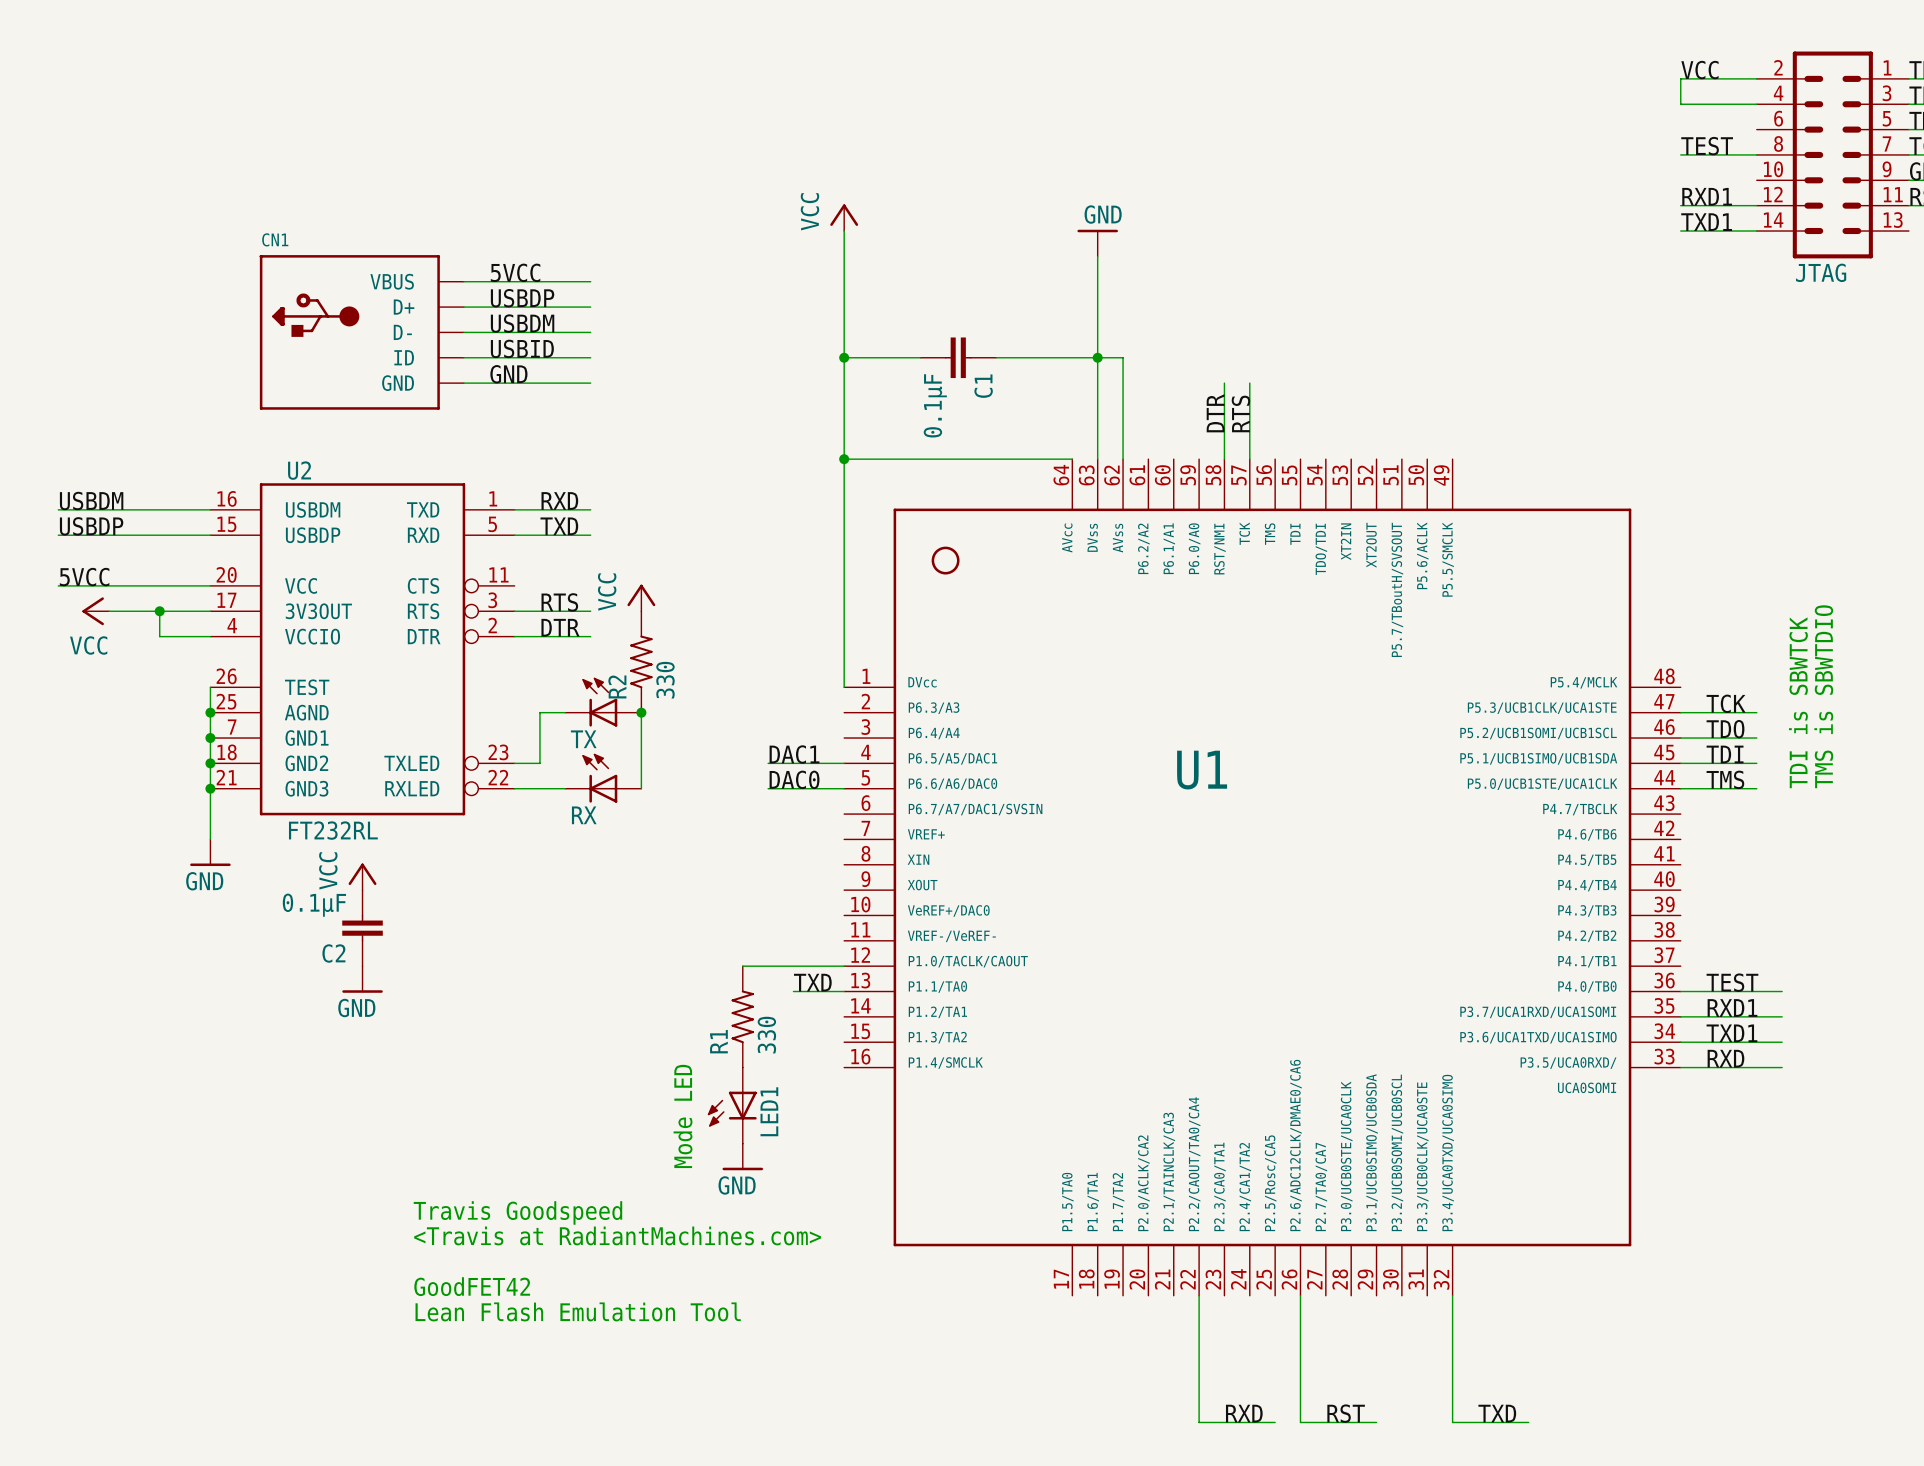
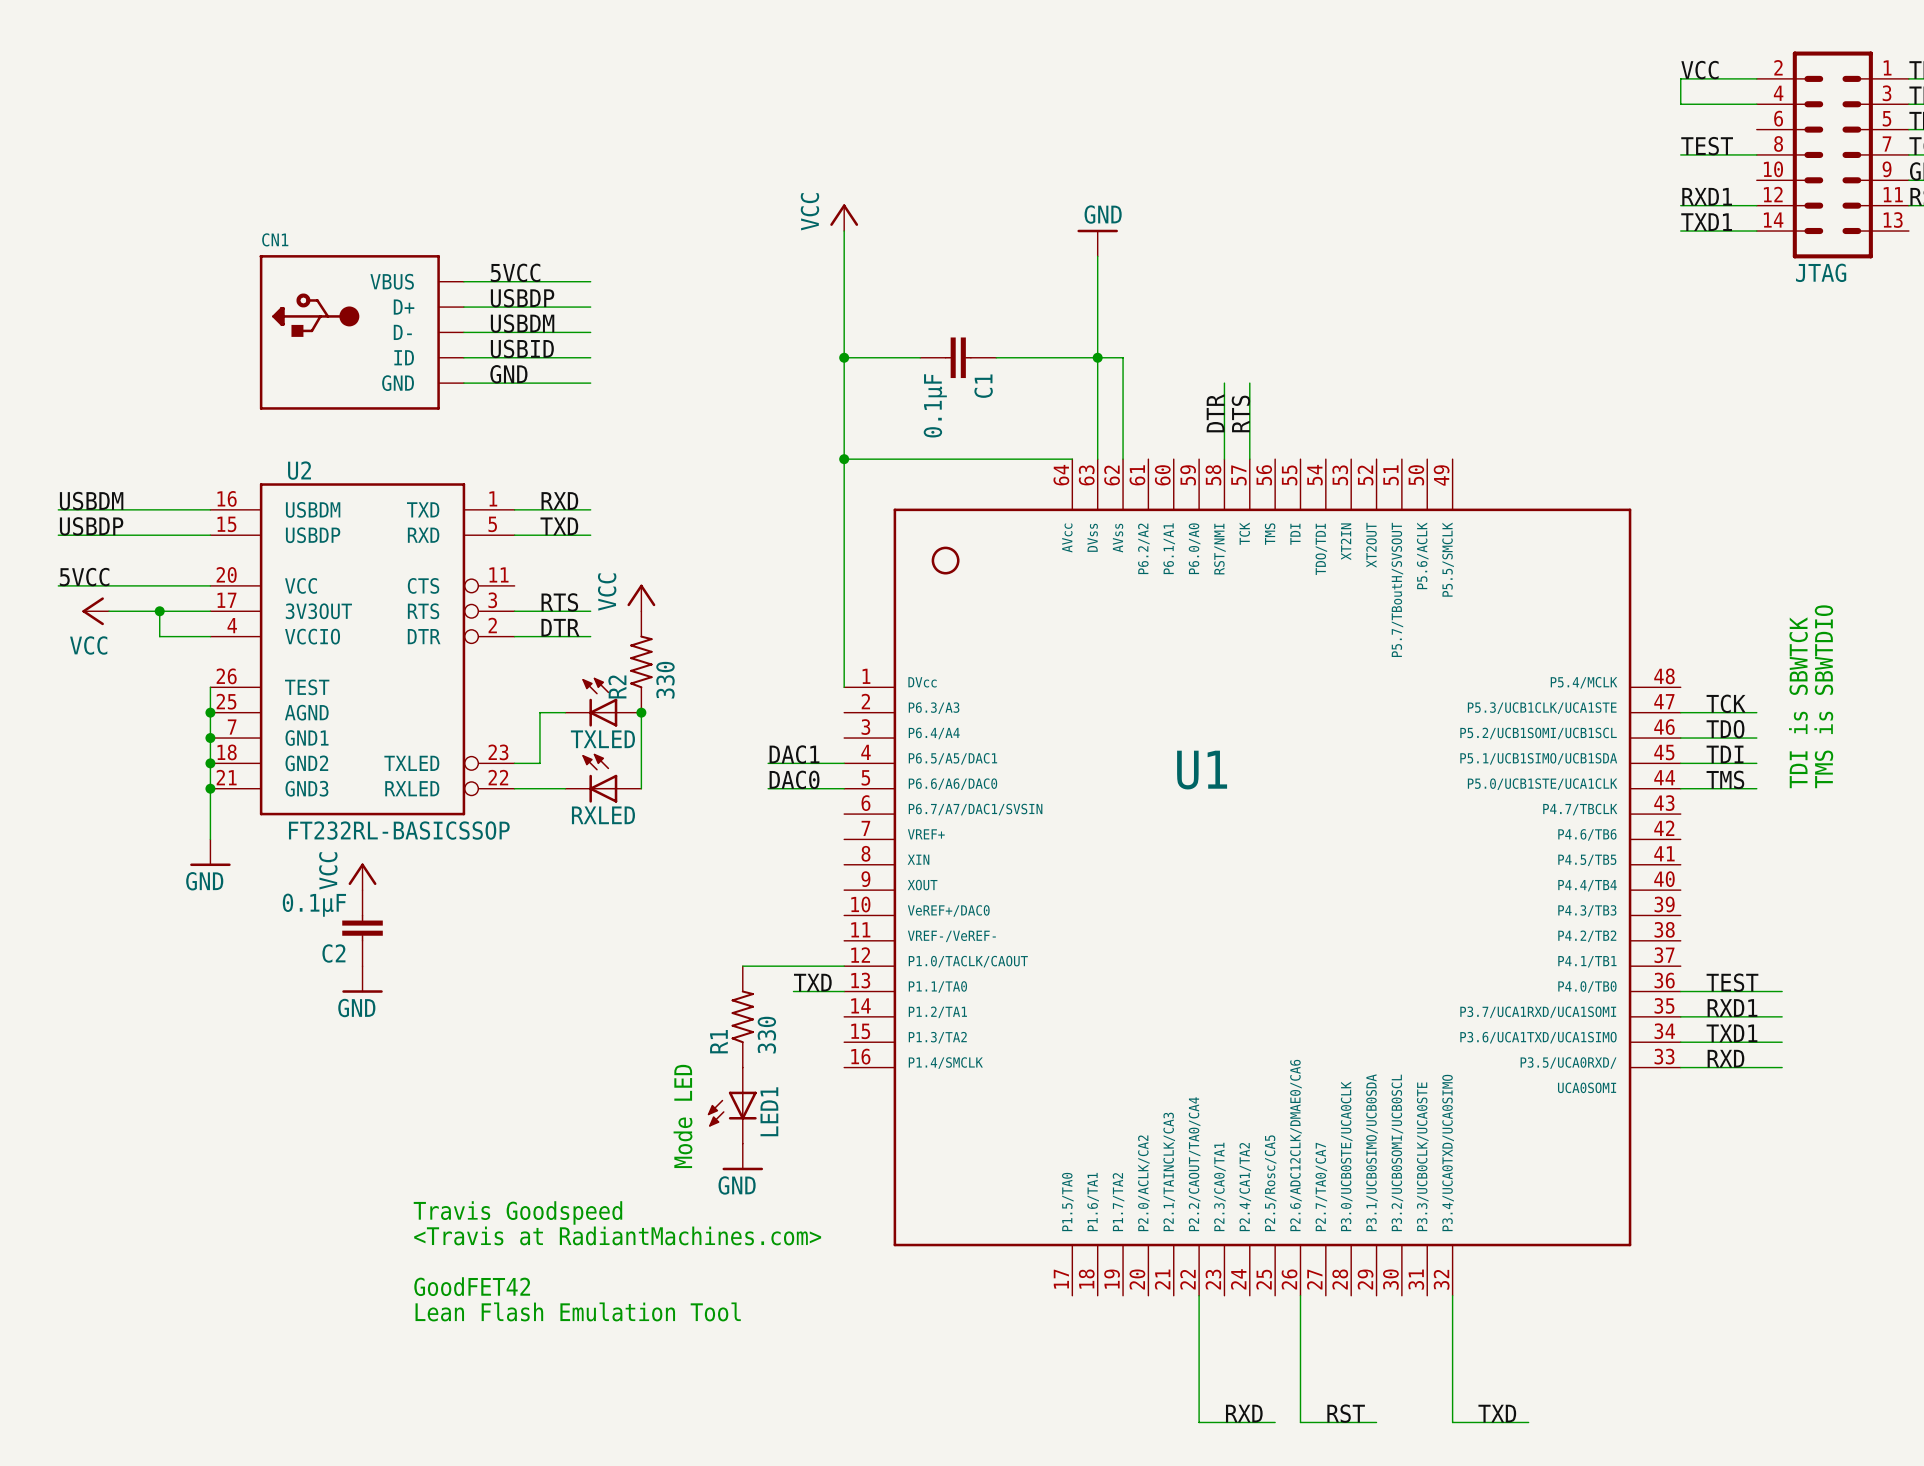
TX name: TX (583, 739) -> TXLED (602, 739)
RX name: RX (584, 815) -> RXLED (603, 815)
U2 value: FT232RL (333, 830) -> FT232RL-BASICSSOP (399, 830)

